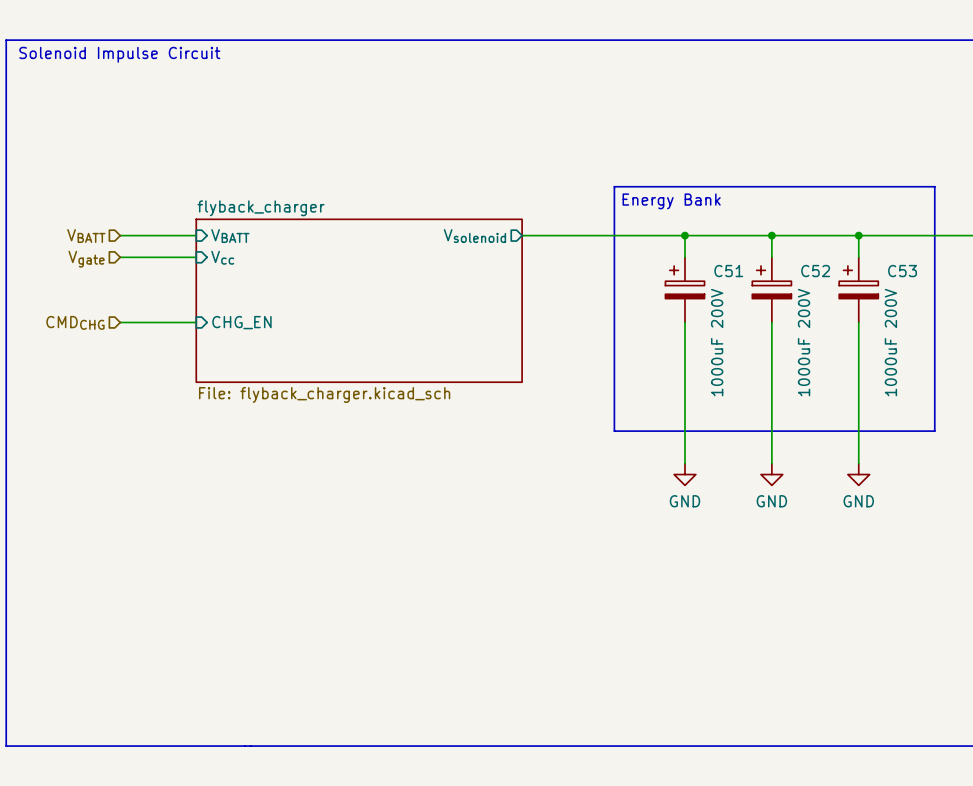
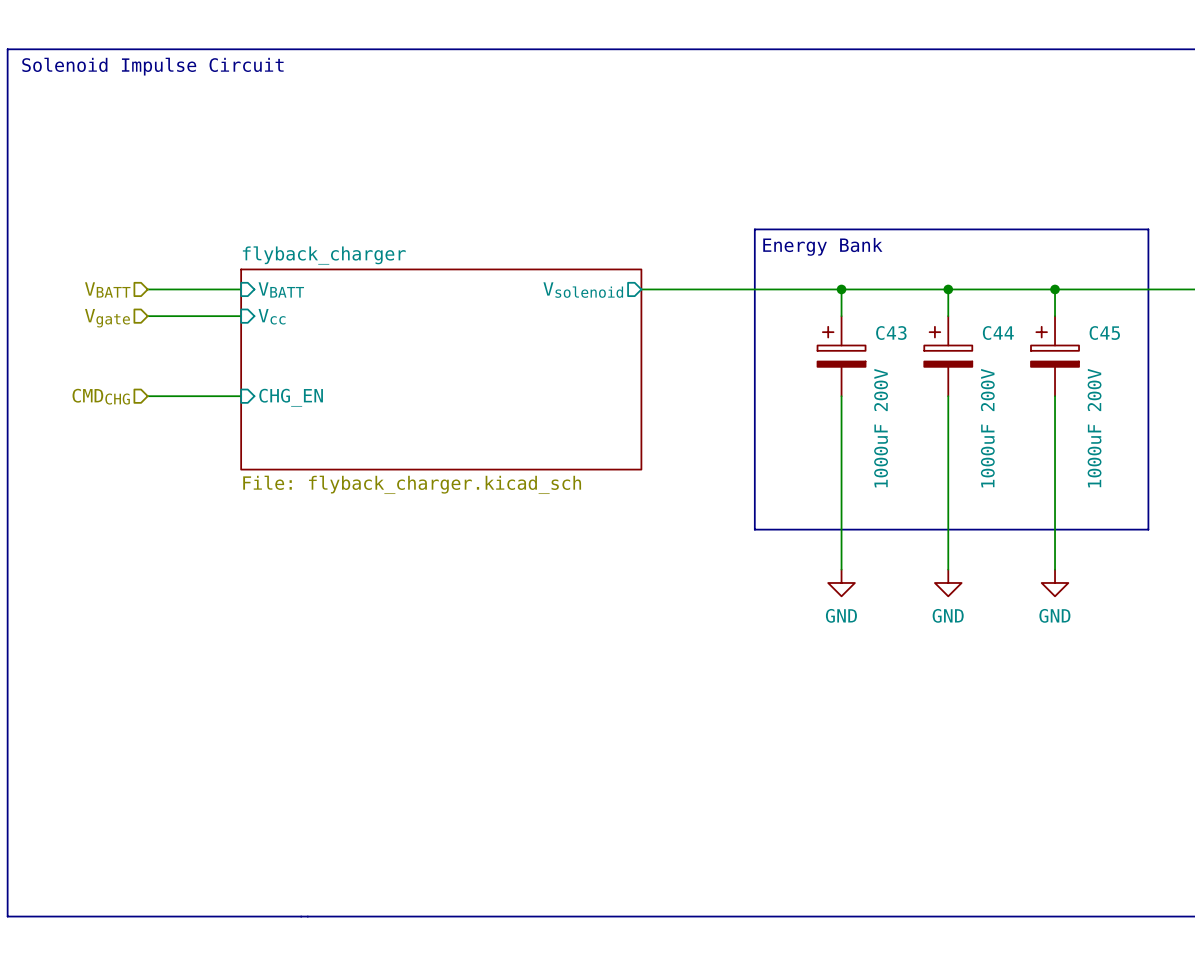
C51 name: C51 (728, 271) -> C43 (891, 333)
C52 name: C52 (815, 271) -> C44 (998, 333)
C53 name: C53 (902, 271) -> C45 (1104, 333)

